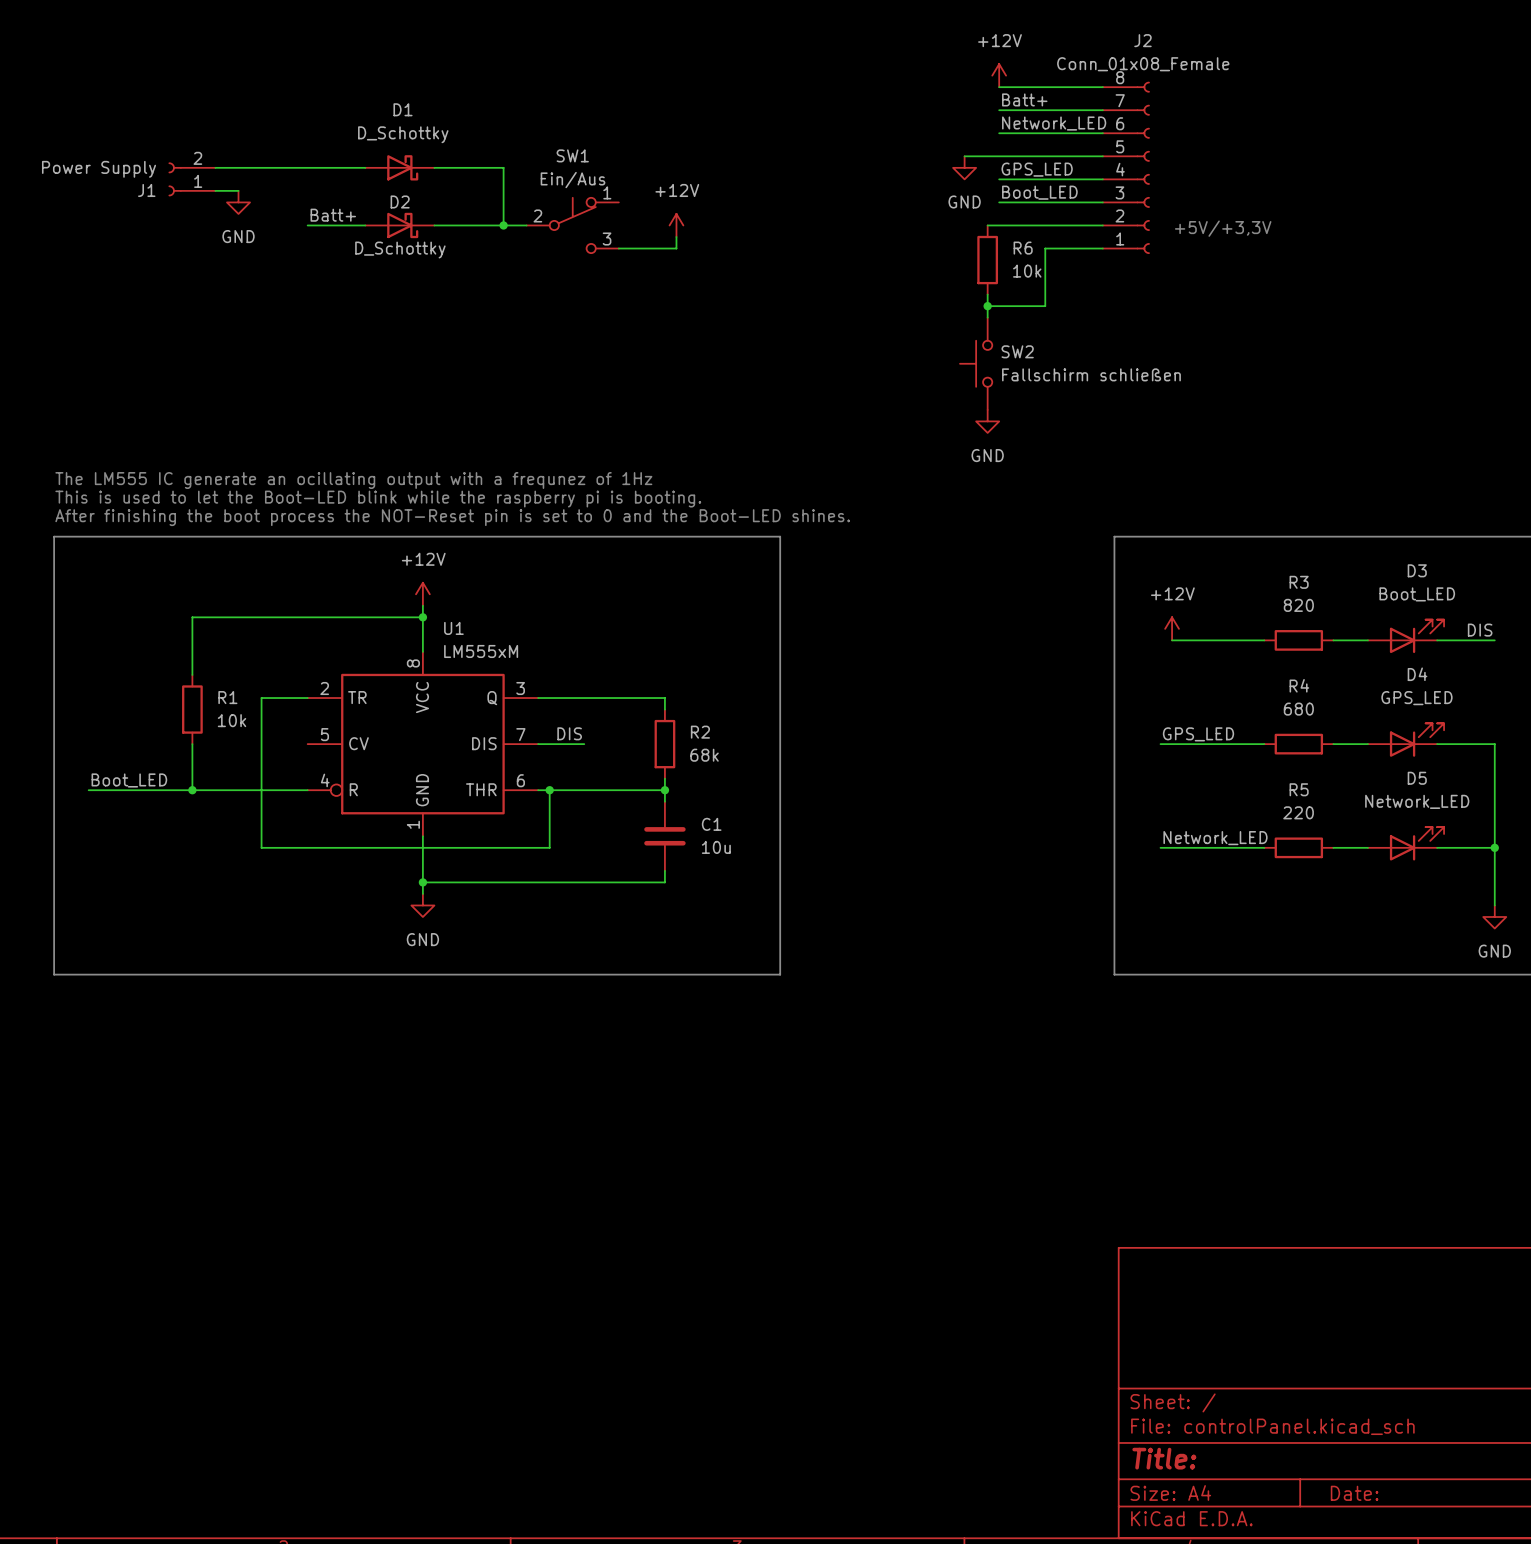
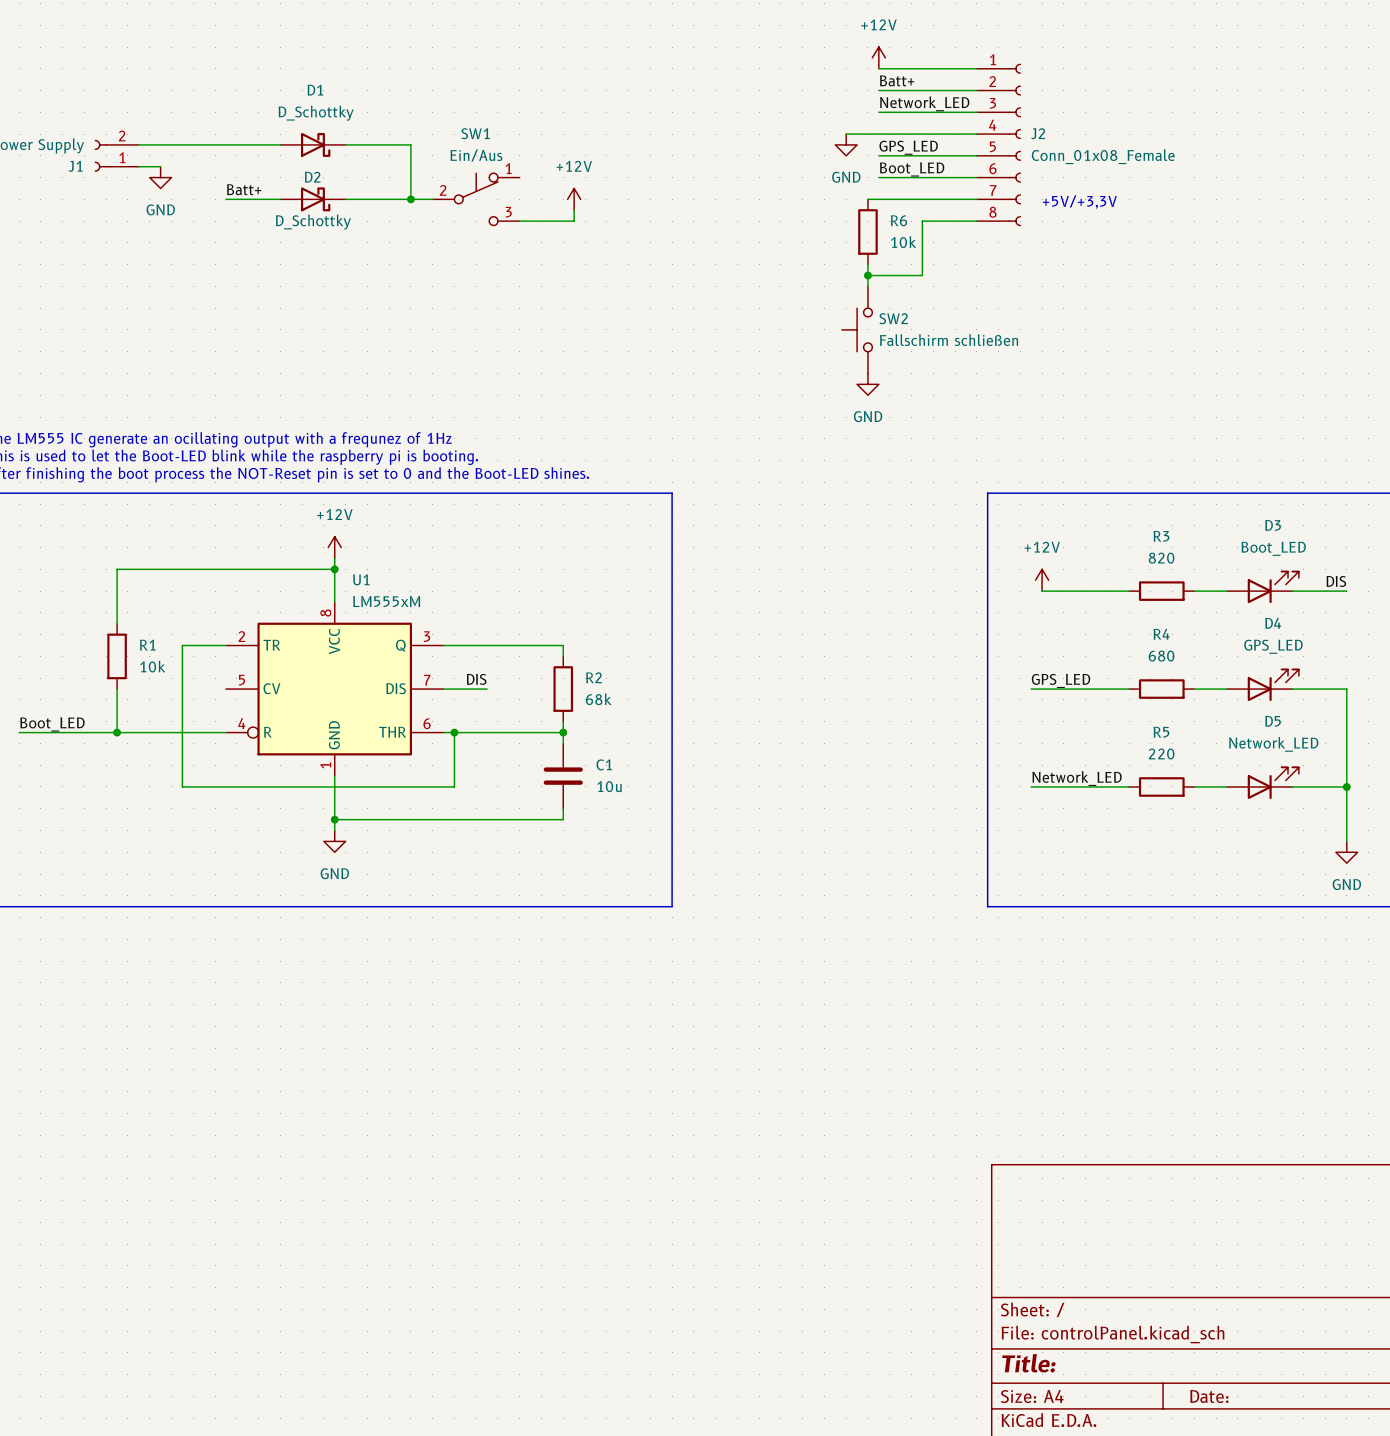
J2 name position: J2 (1142, 40) -> J2 (1038, 133)
J2 value position: Conn_01x08_Female (1143, 64) -> Conn_01x08_Female (1103, 156)
J2 flip: as is (1143, 167) -> up-down (1014, 144)

